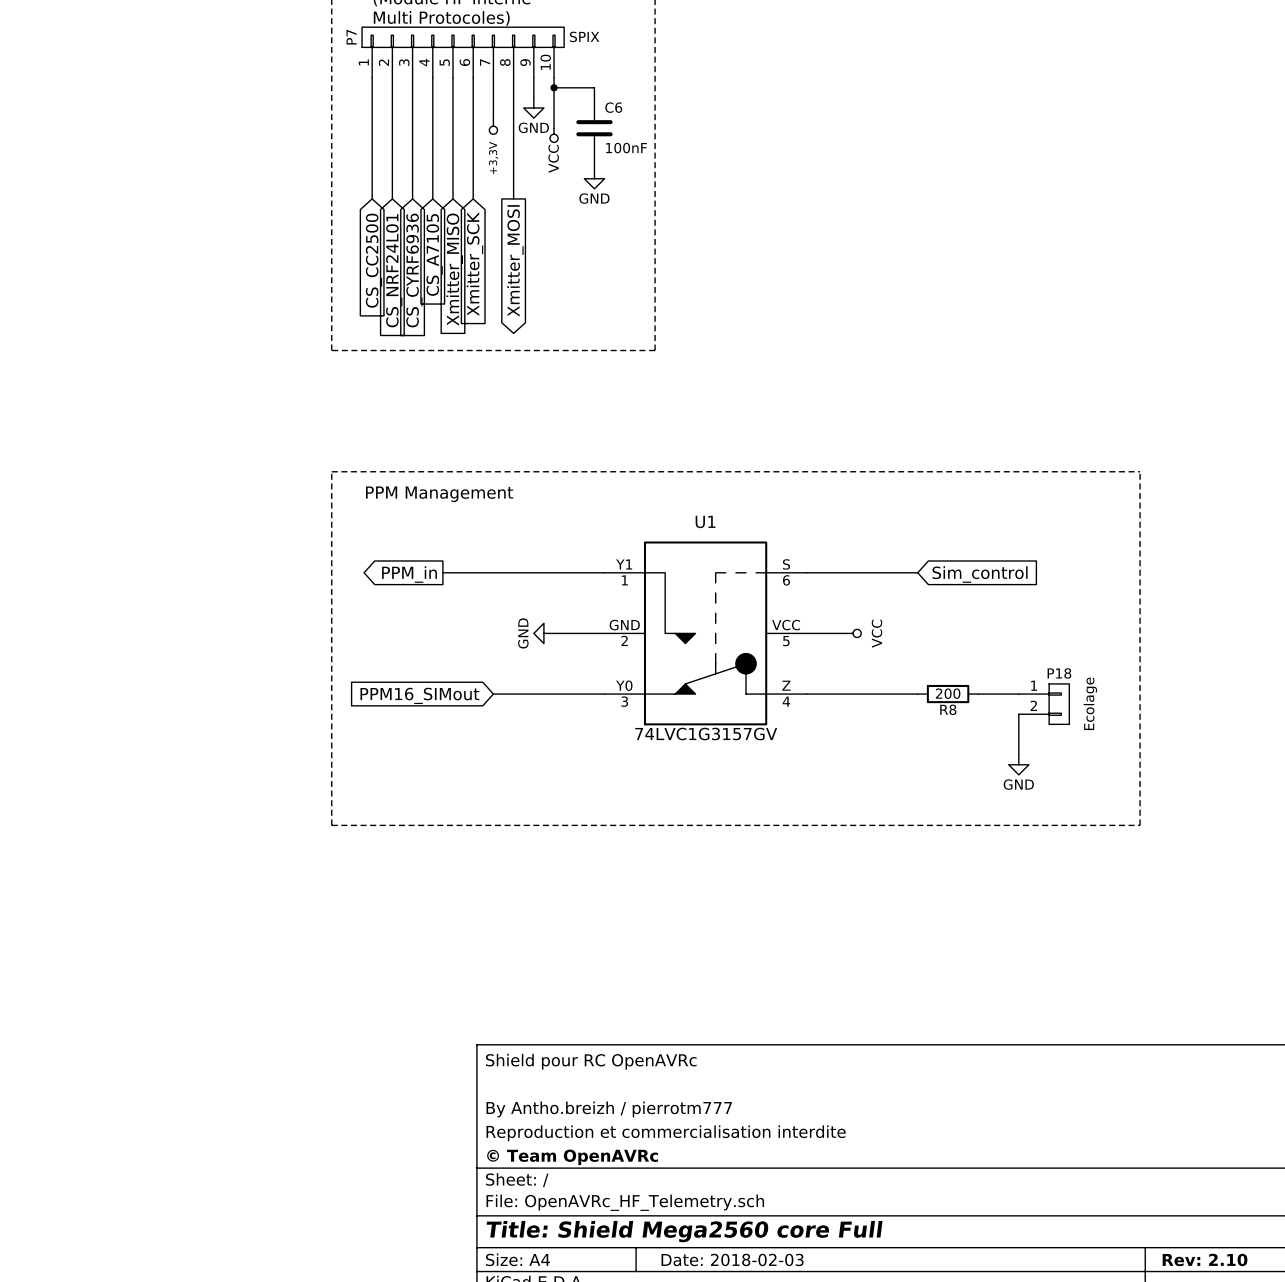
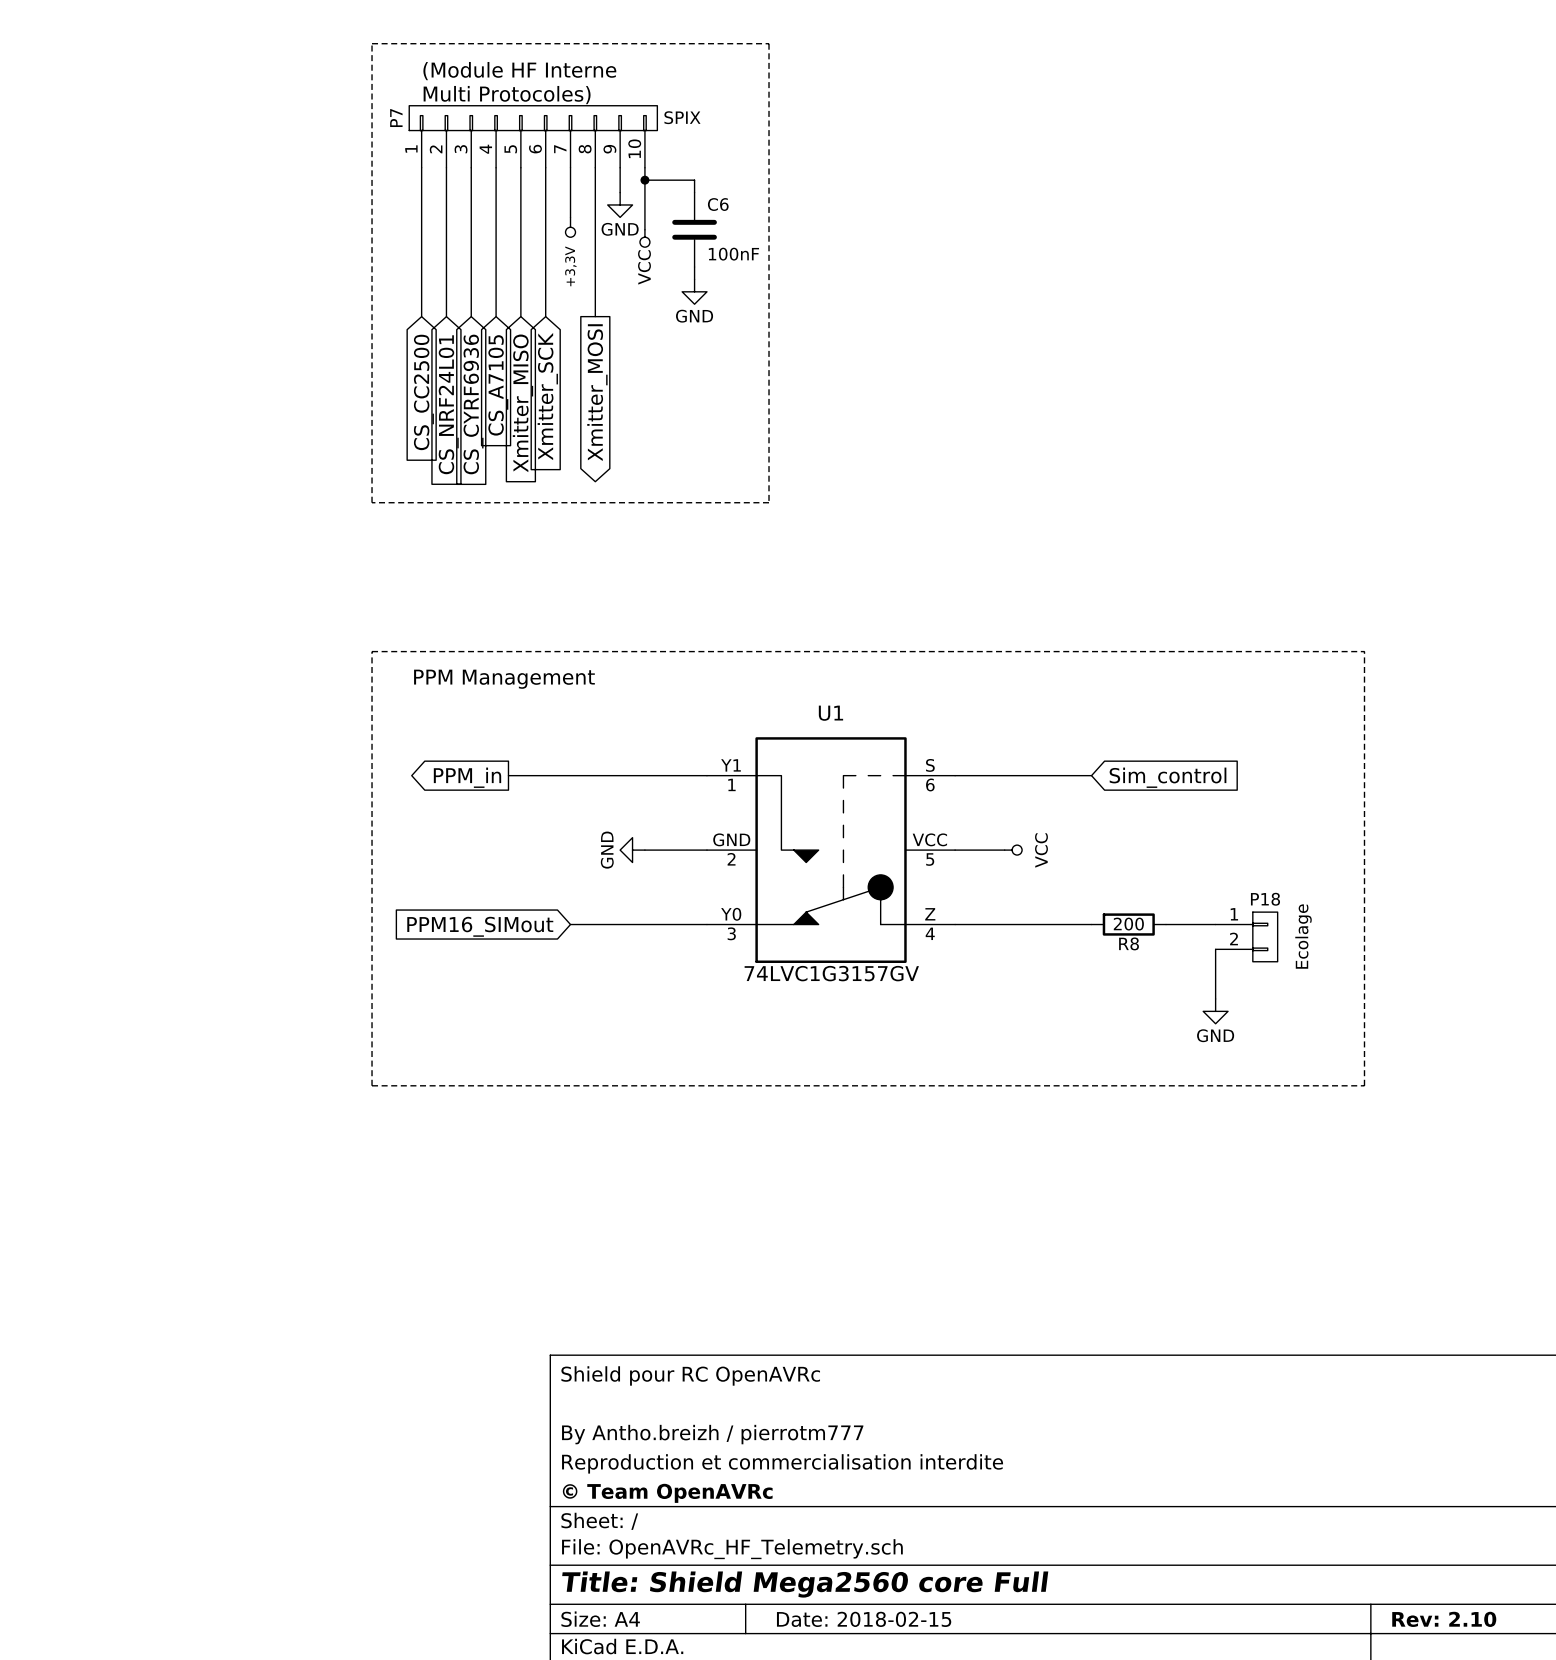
title block: Date: 2018-02-03 (732, 1259) -> Date: 2018-02-15 (864, 1619)

